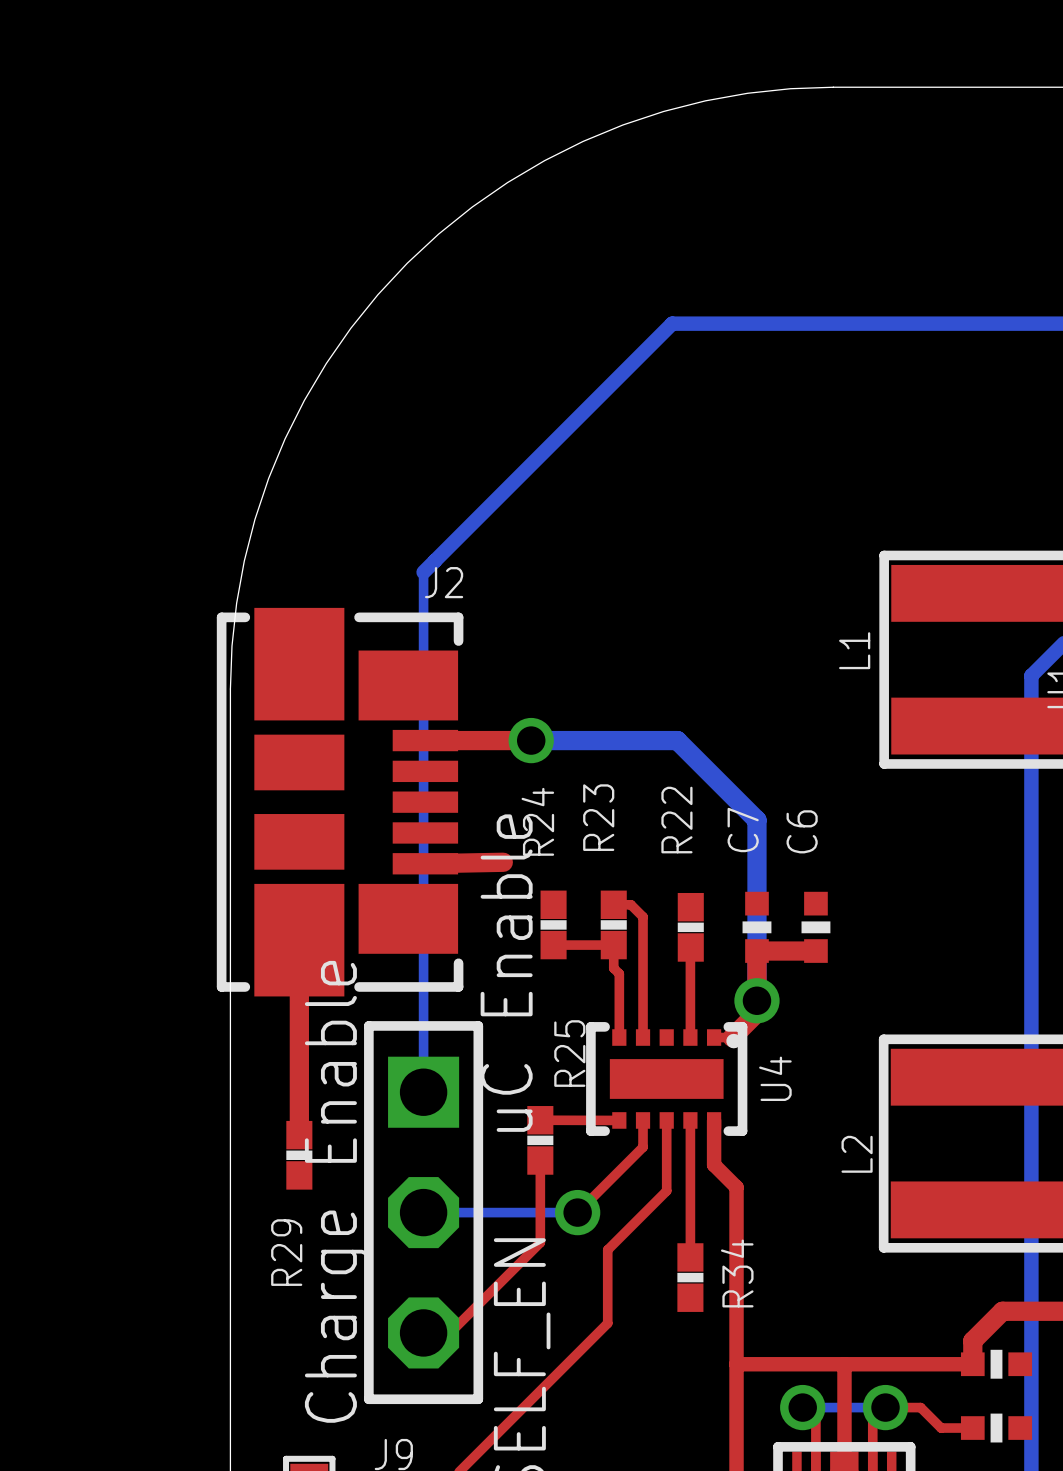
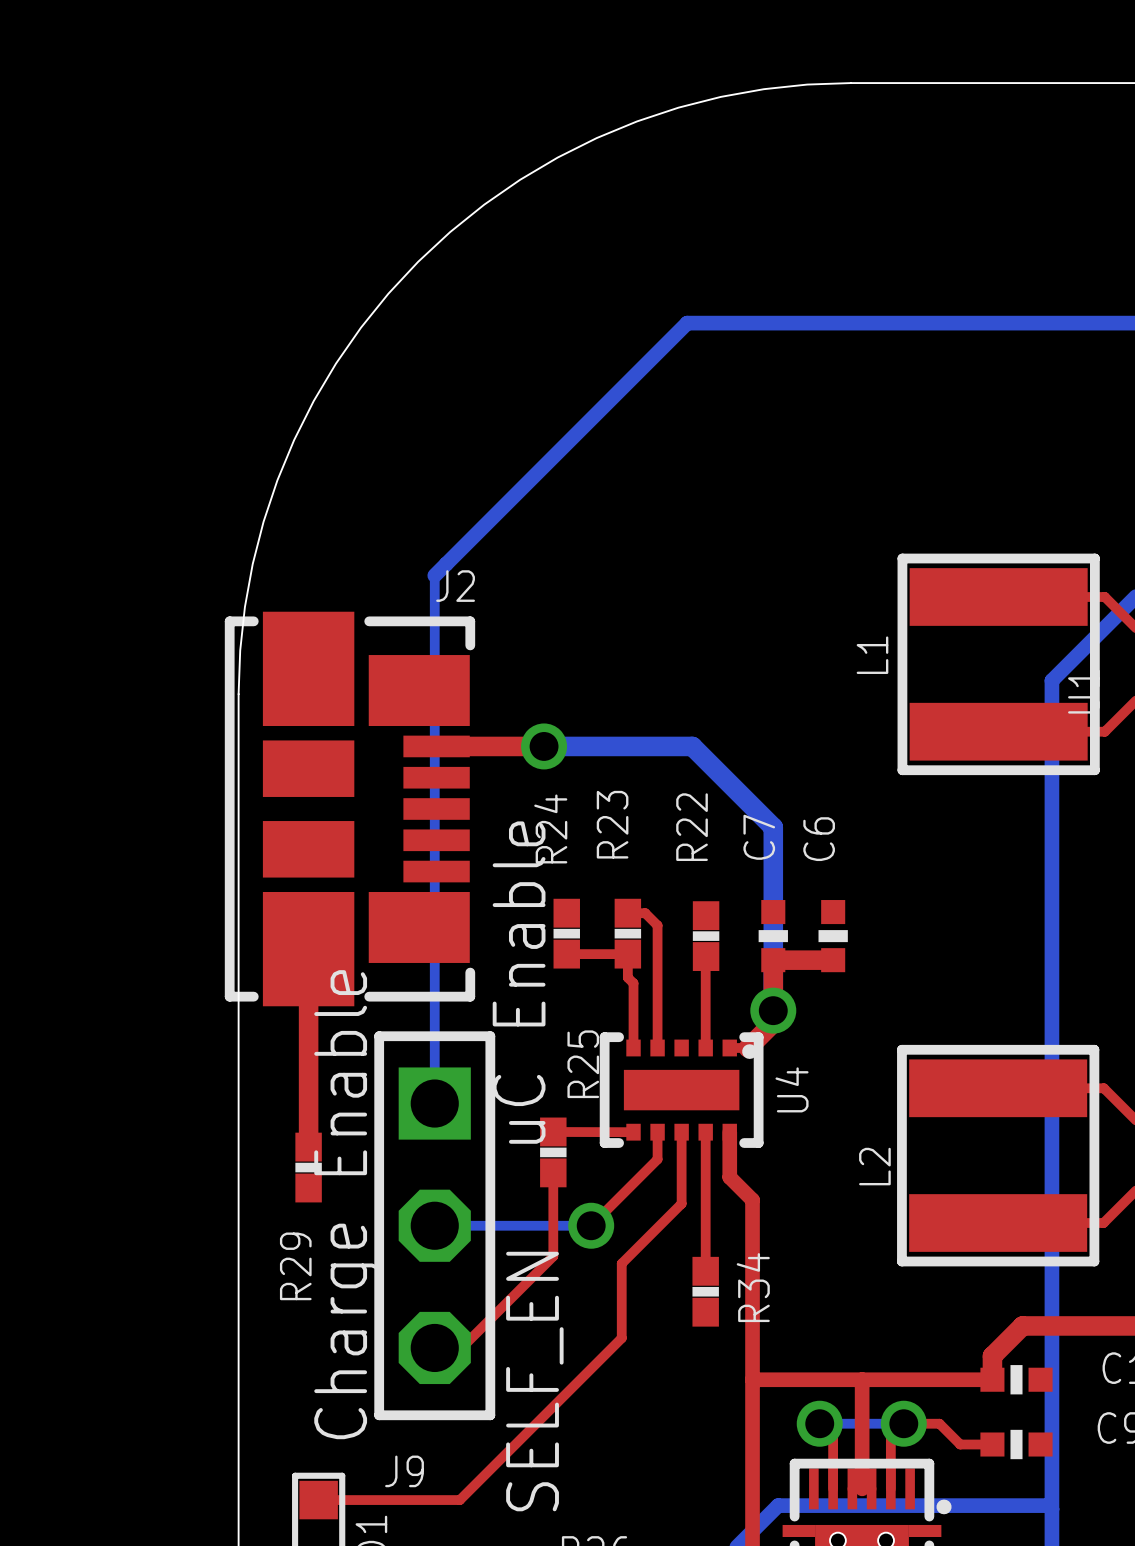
top track: (503, 862) (425, 863) -> none

